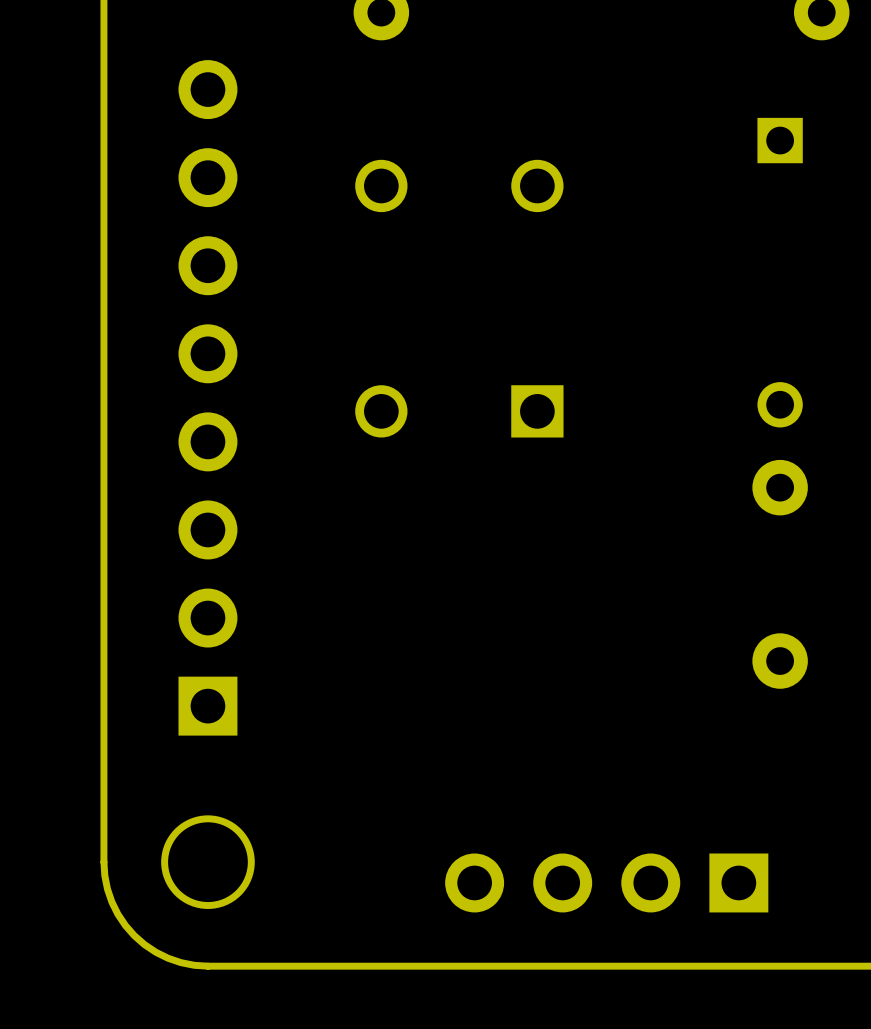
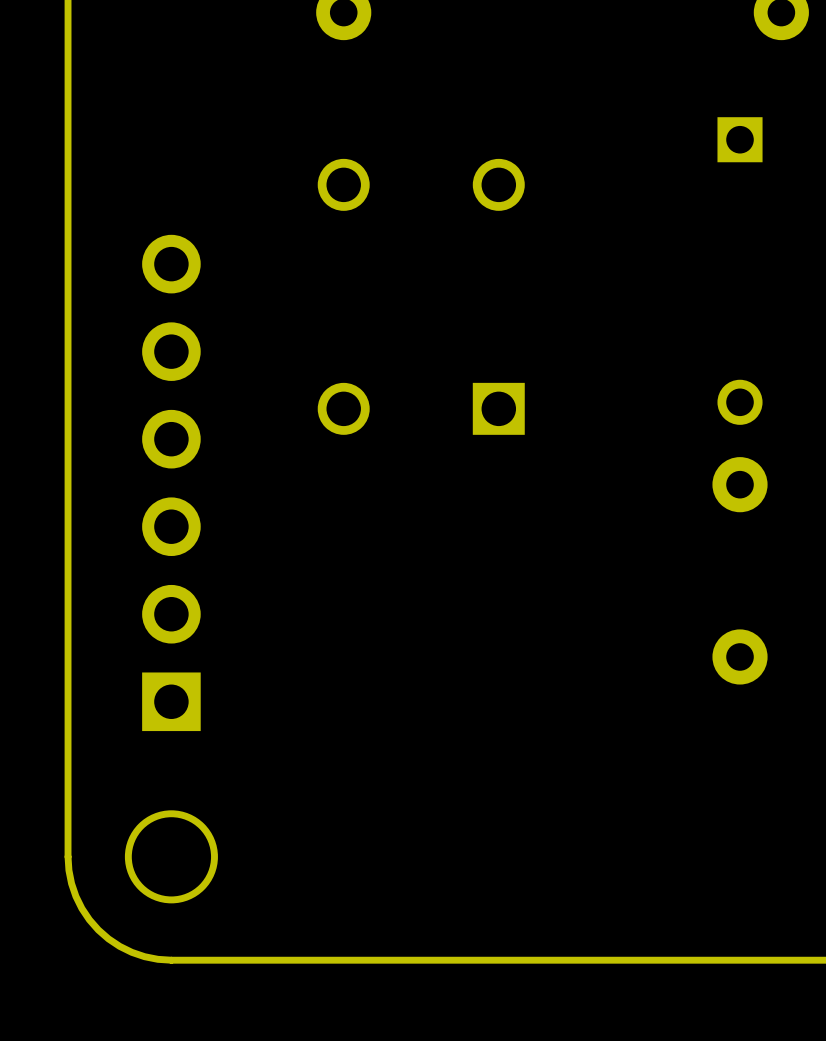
part: (207, 397) -> none
part: (606, 882) -> none

